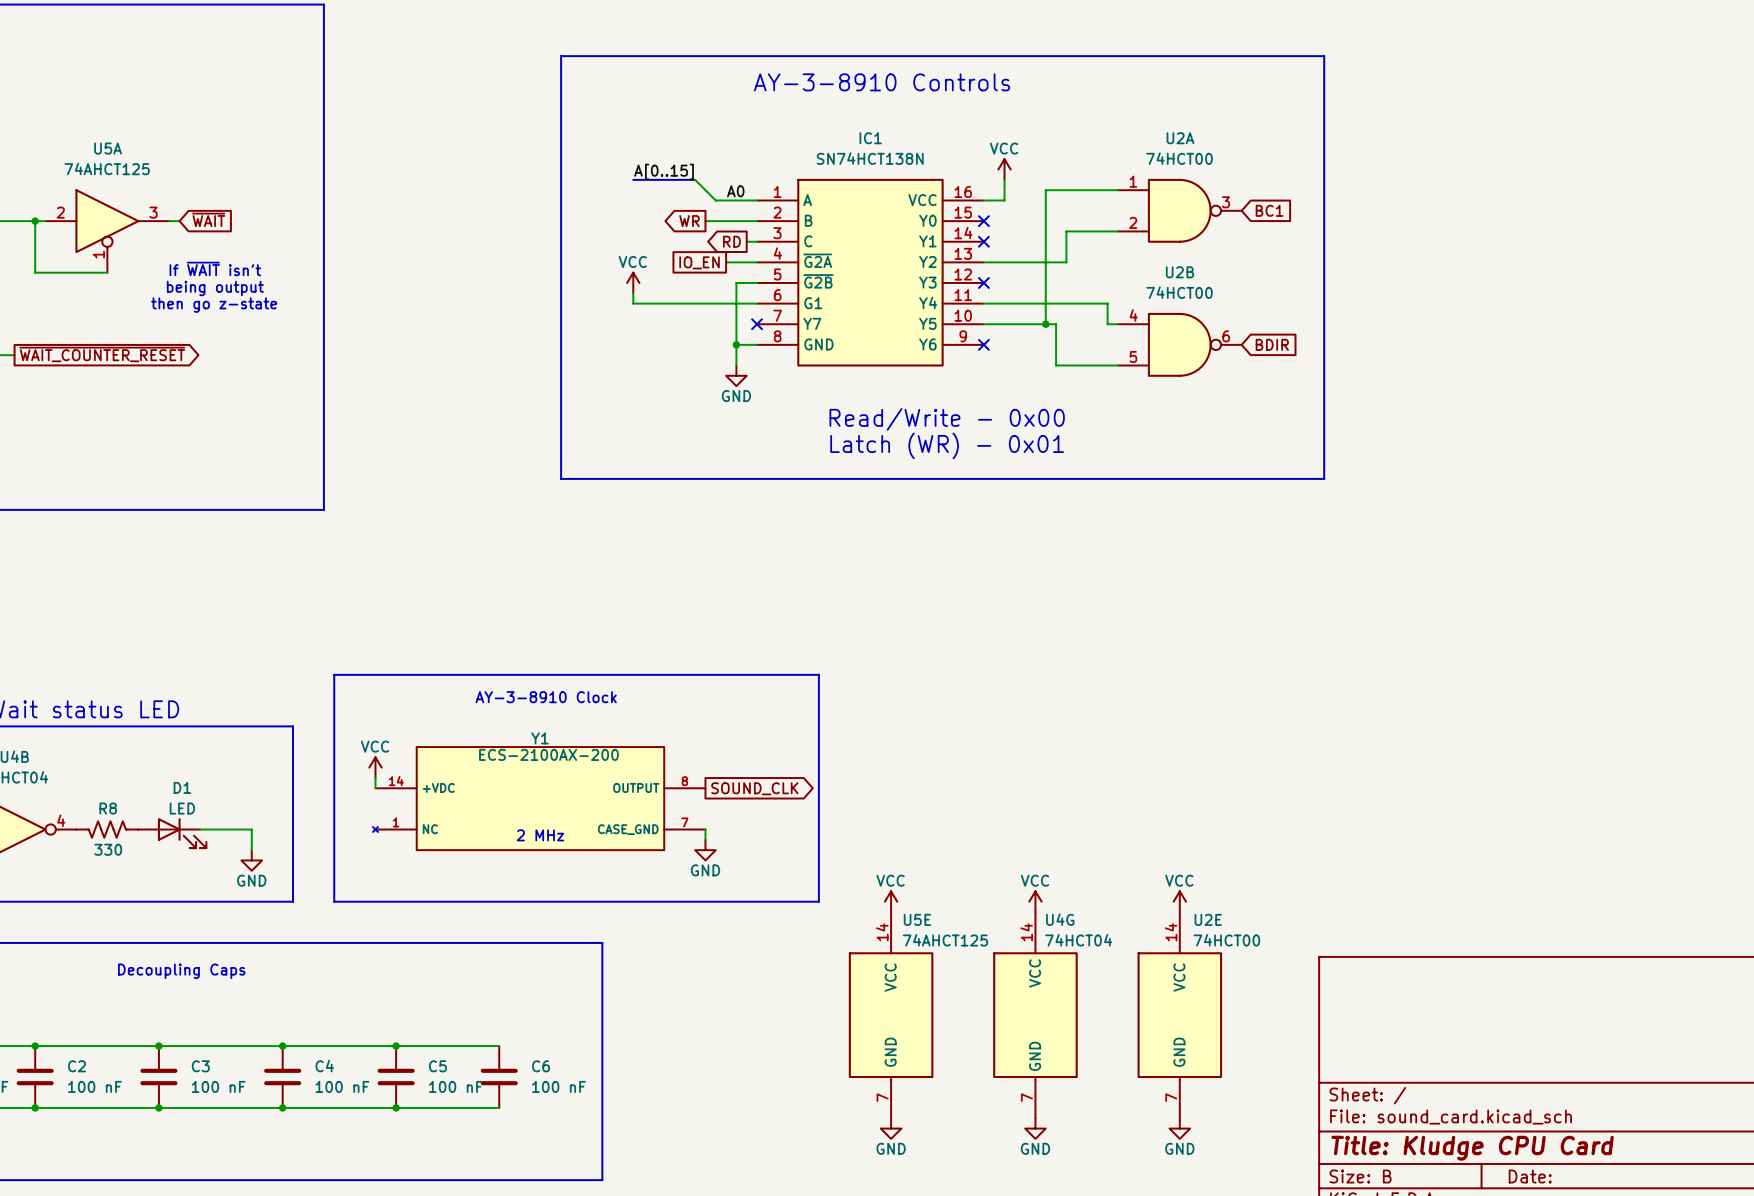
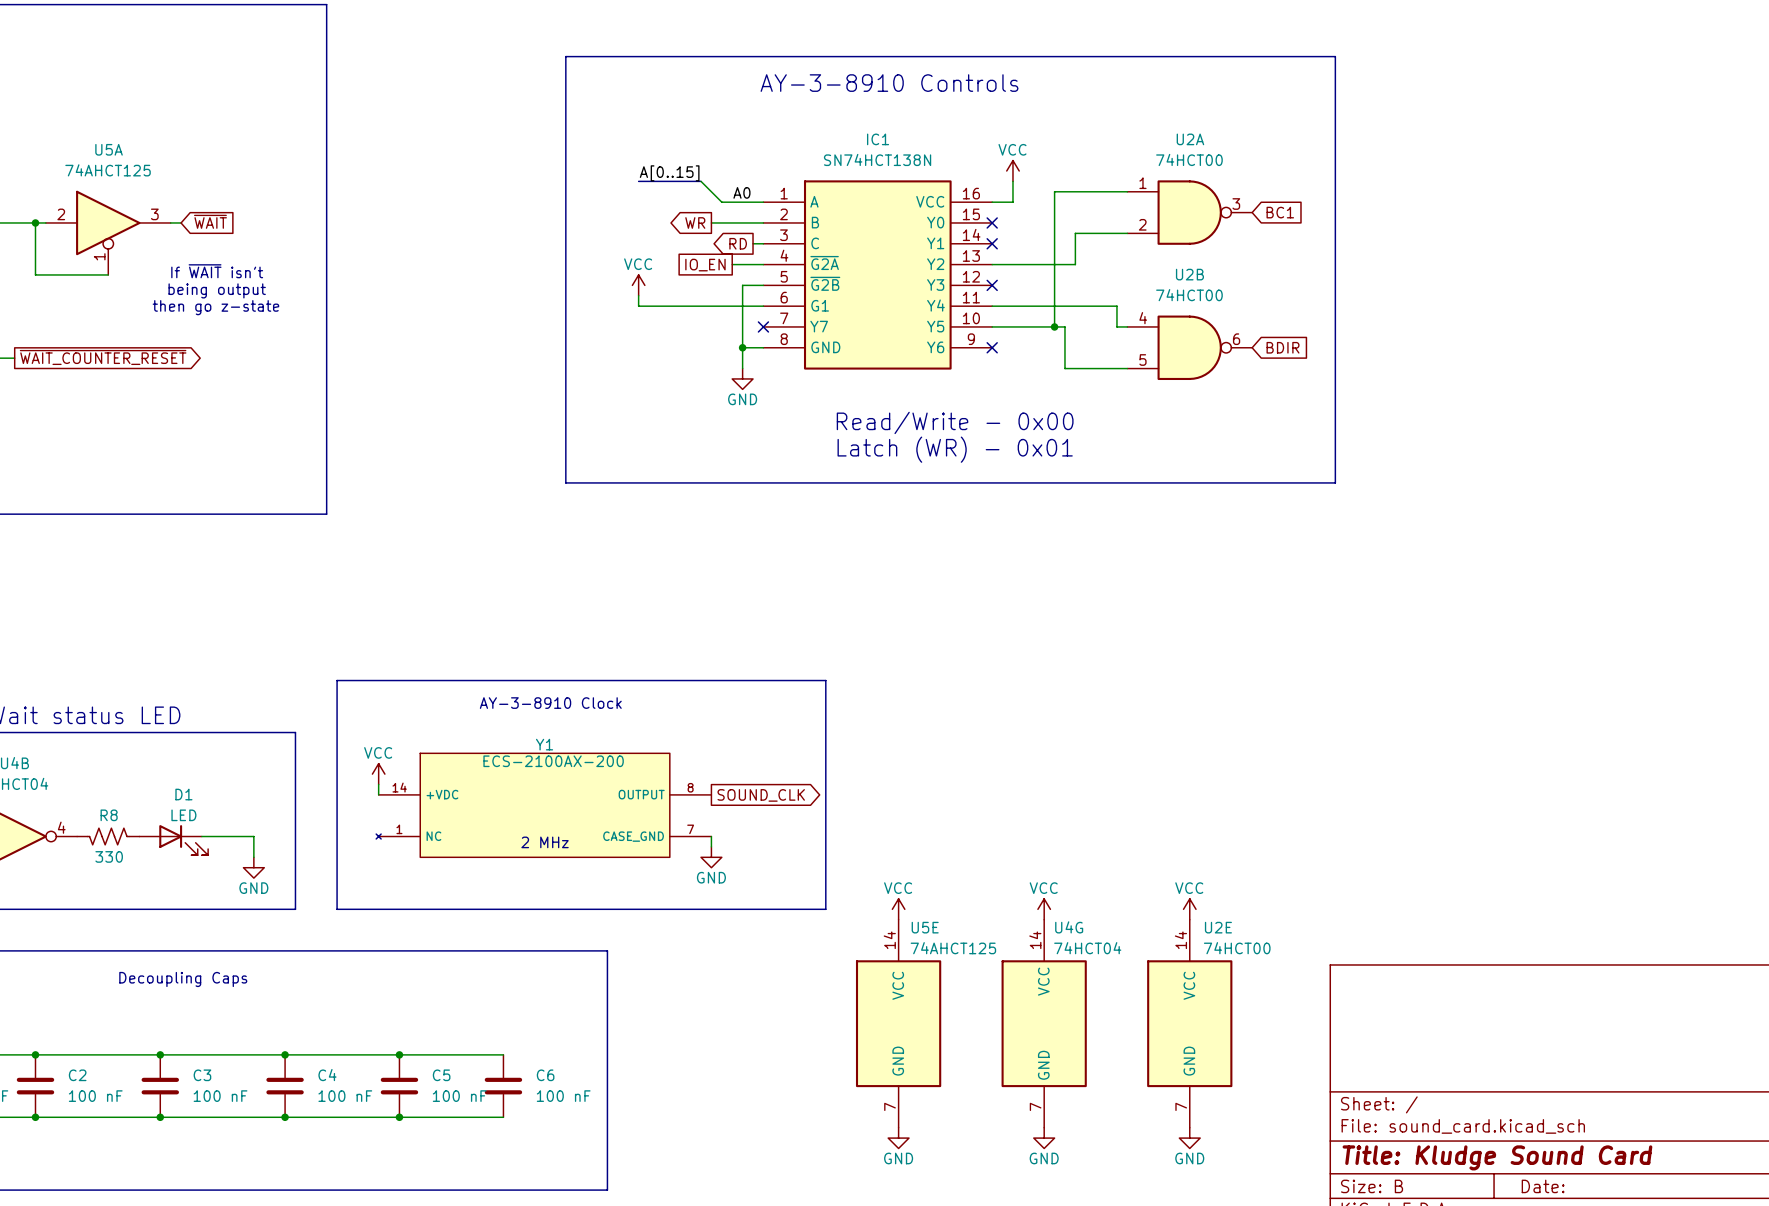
title block: Title: Kludge CPU Card (1472, 1148) -> Title: Kludge Sound Card (1497, 1157)

